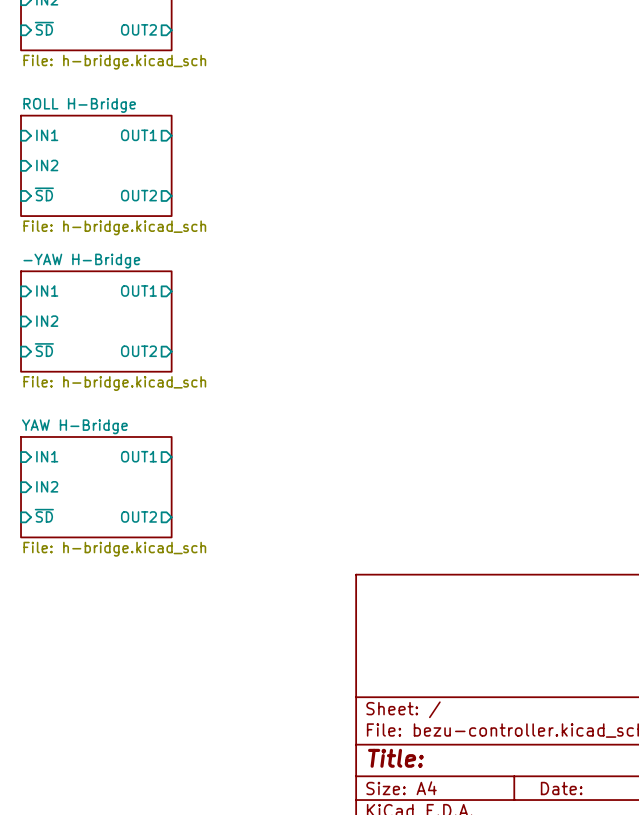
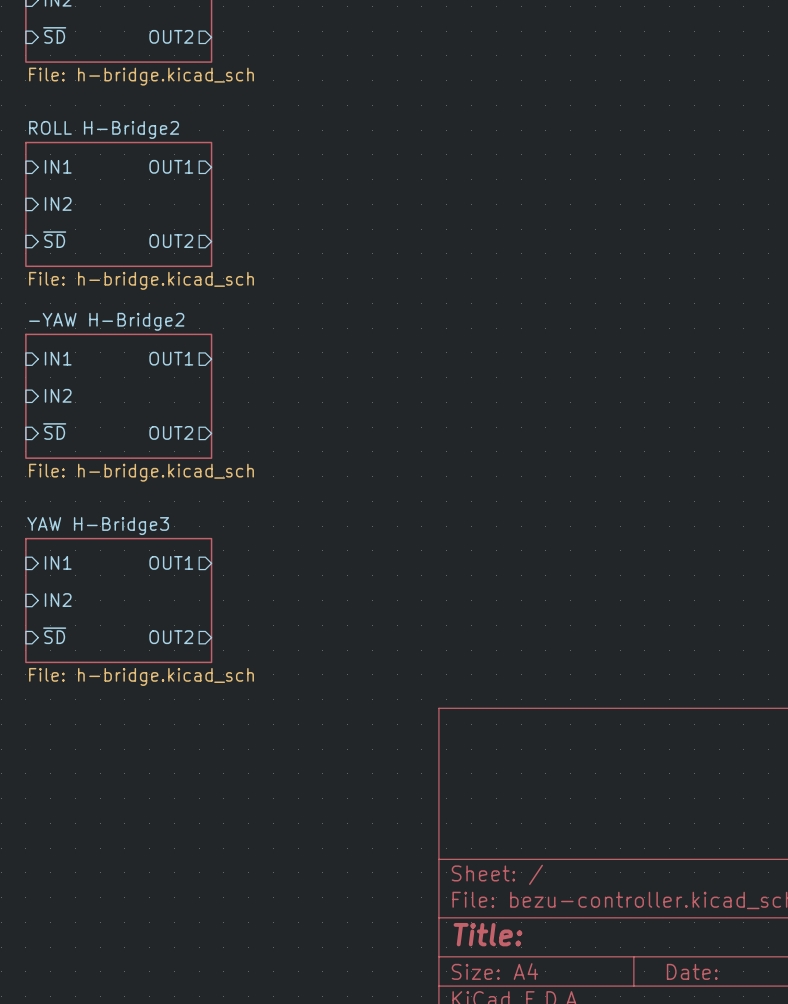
sheet ROLL H-Bridge name: ROLL H-Bridge (79, 105) -> ROLL H-Bridge2 (104, 129)
sheet -YAW H-Bridge name: -YAW H-Bridge (81, 261) -> -YAW H-Bridge2 (106, 321)
sheet YAW H-Bridge name: YAW H-Bridge (74, 426) -> YAW H-Bridge3 (98, 526)

